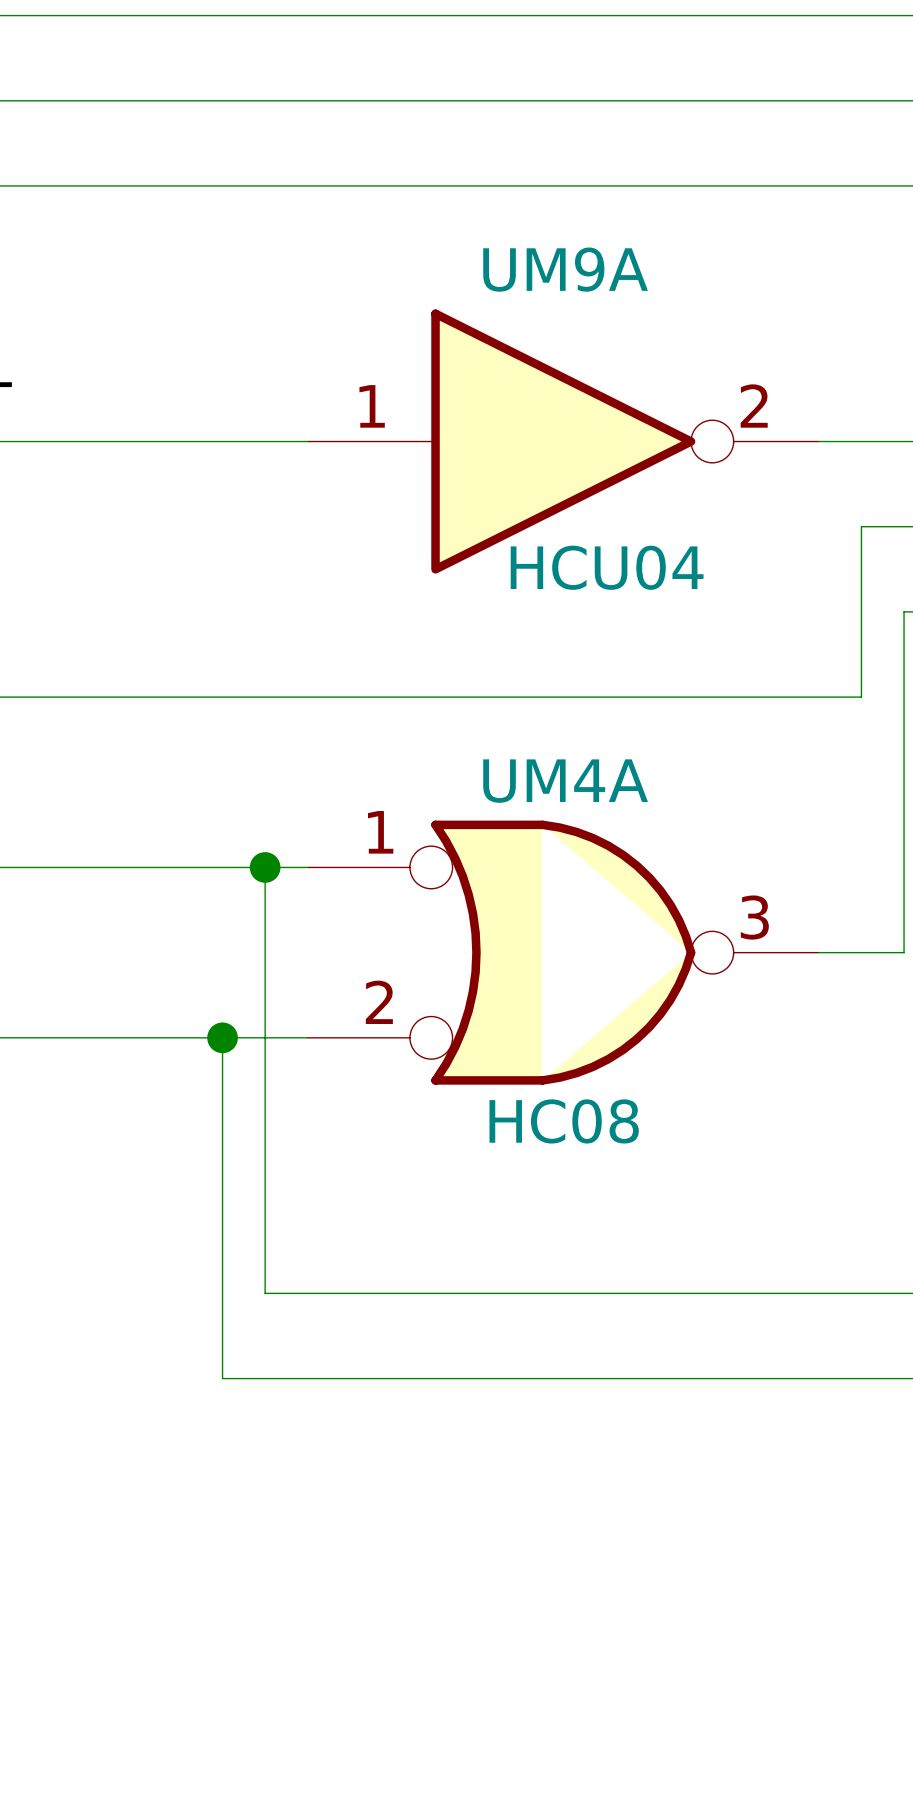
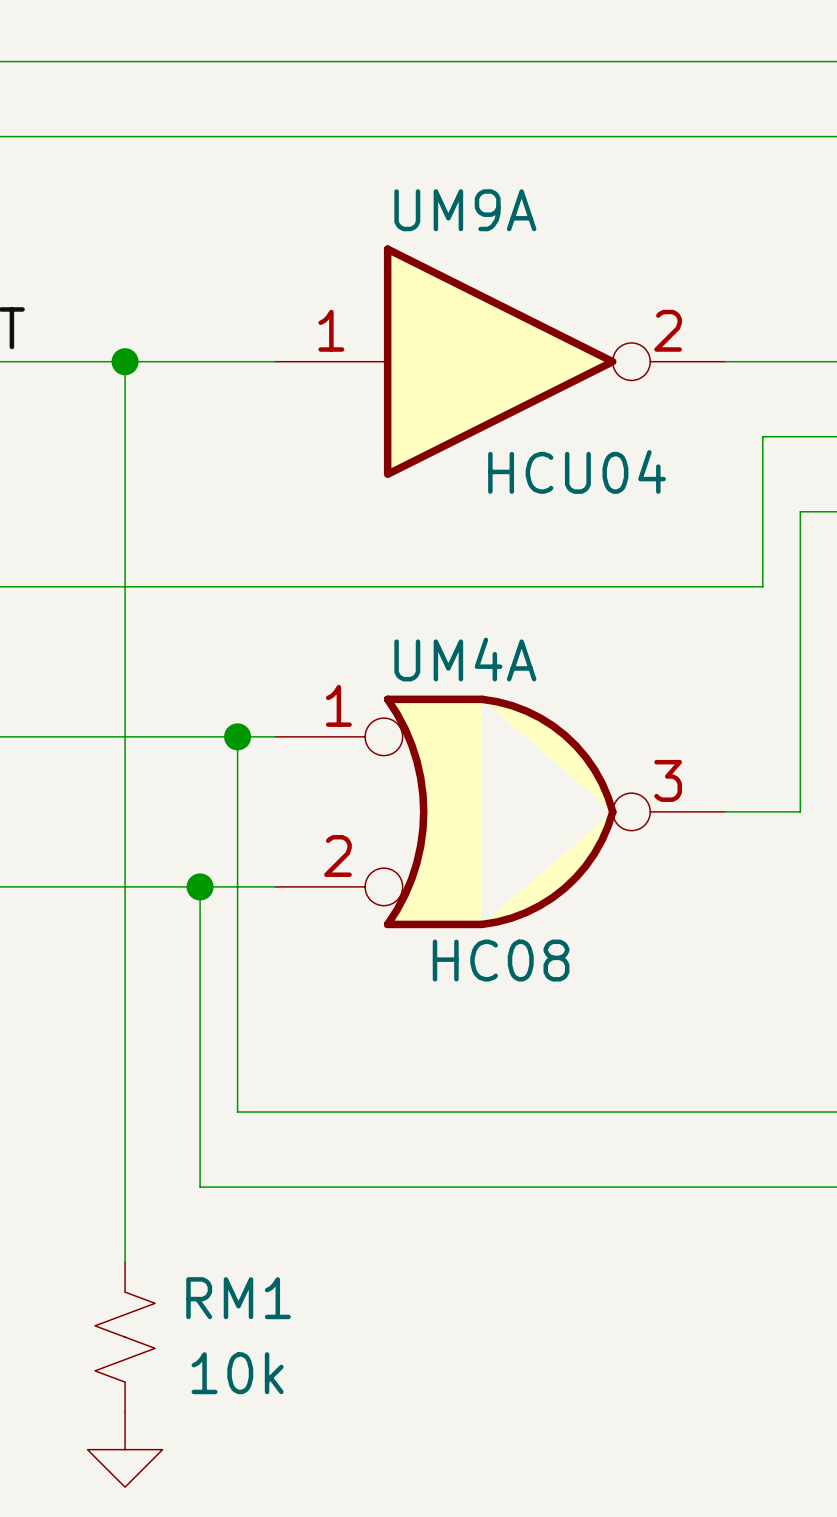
UM9A name position: UM9A (565, 269) -> UM9A (465, 210)
wire: none -> (125, 361) (125, 1262)
junction: none -> (125, 361)
UM9A value position: HCU04 (607, 567) -> HCU04 (577, 471)
UM4A name position: UM4A (565, 781) -> UM4A (465, 659)
RM1: none -> 10k (125, 1337)
power symbol: none -> (125, 1449)

